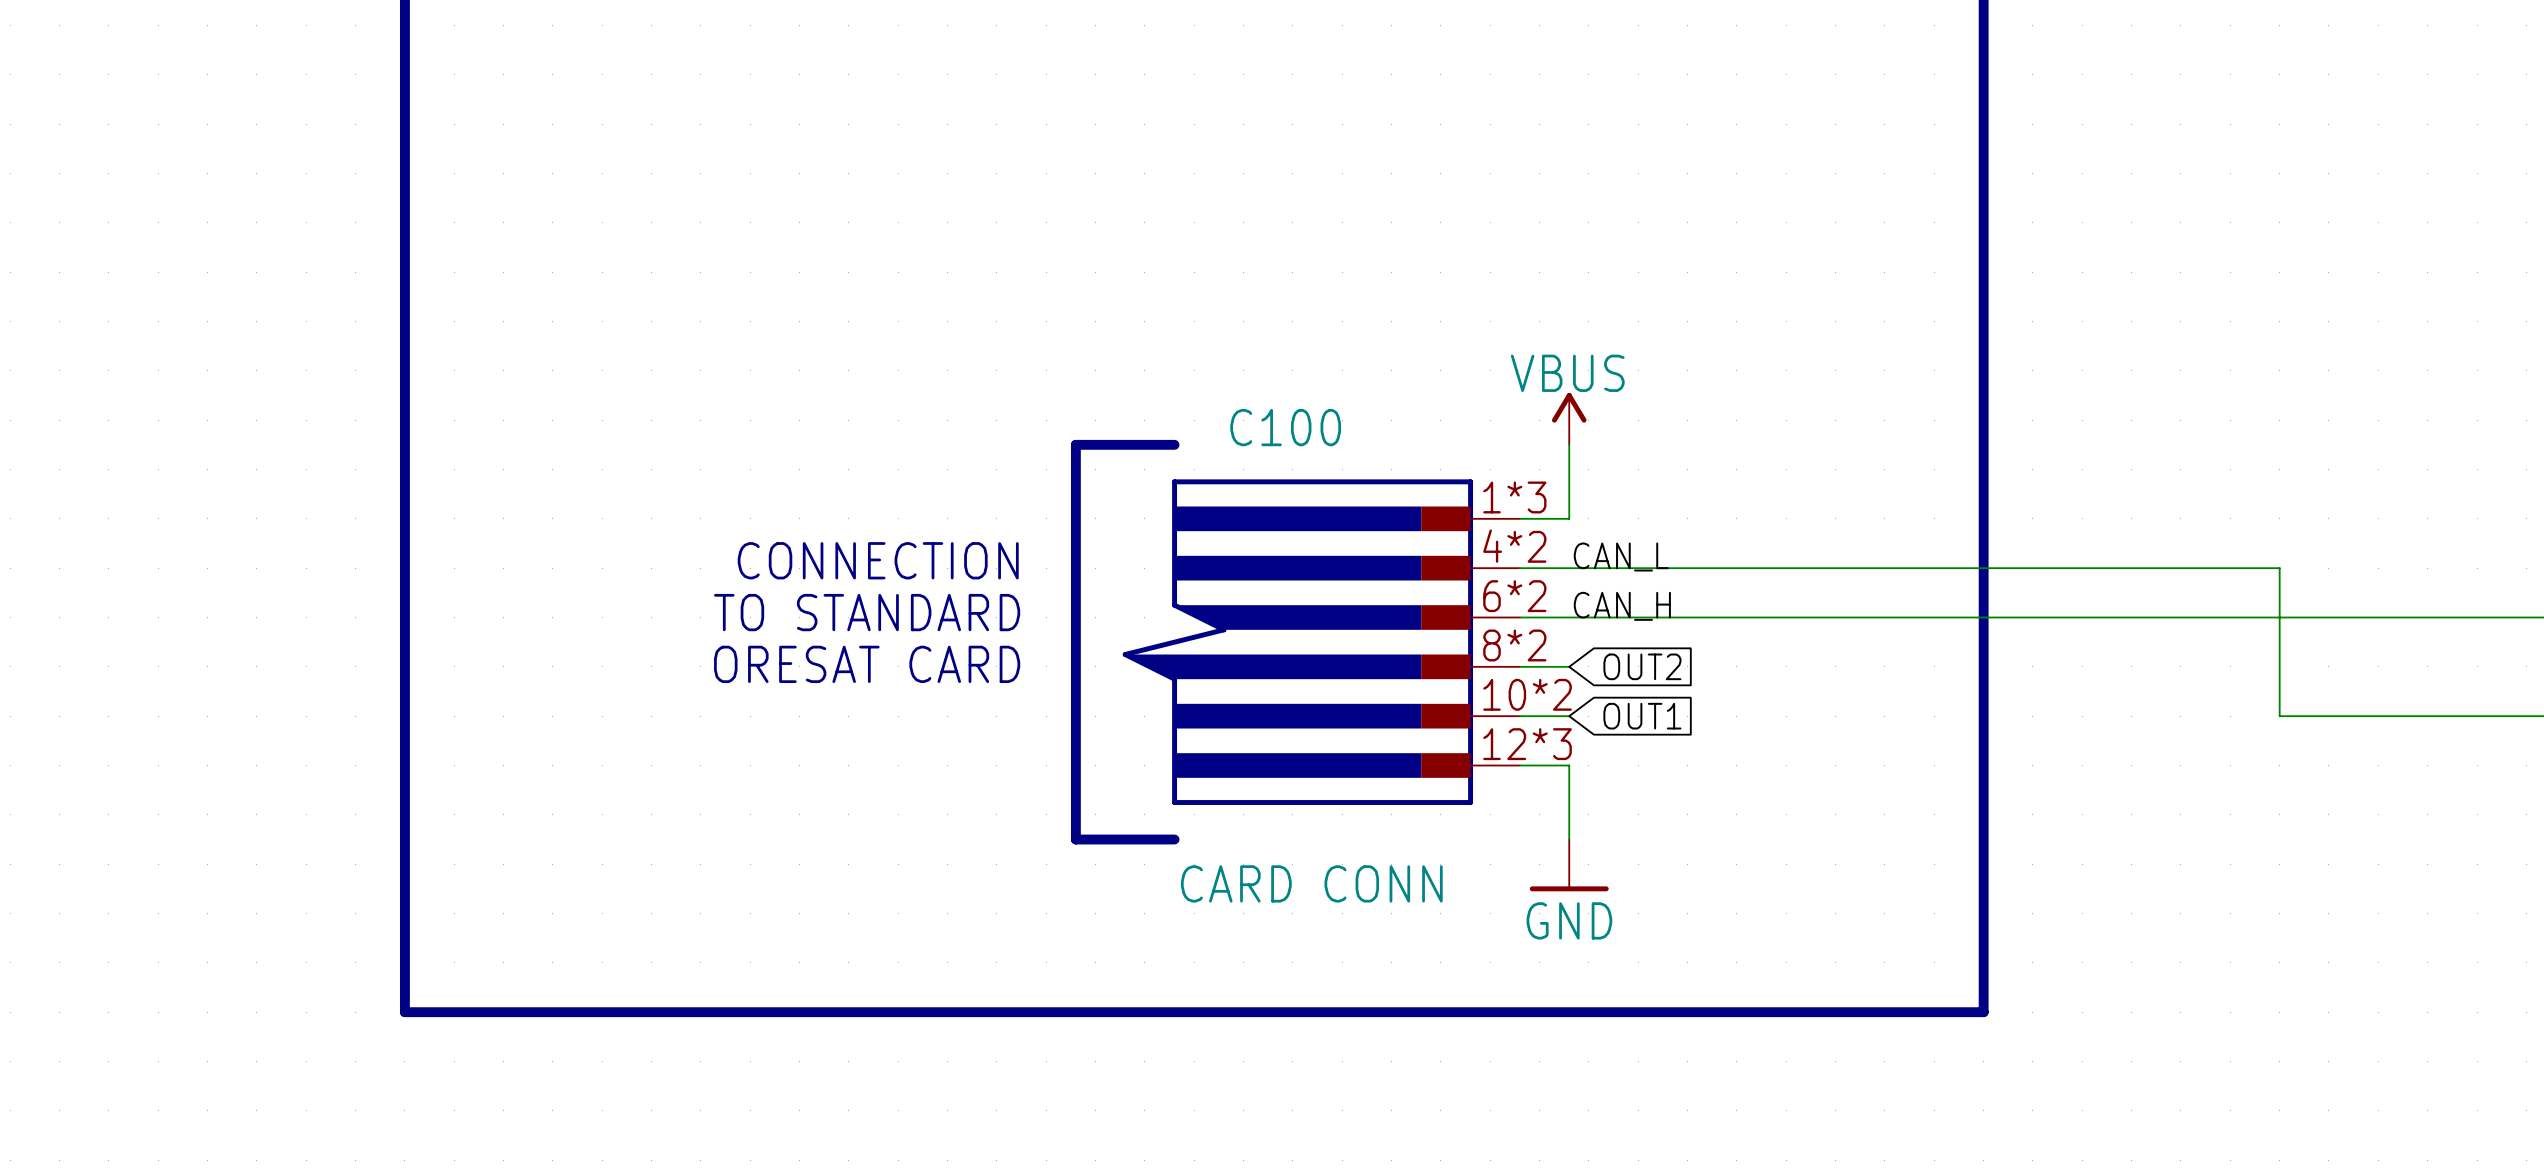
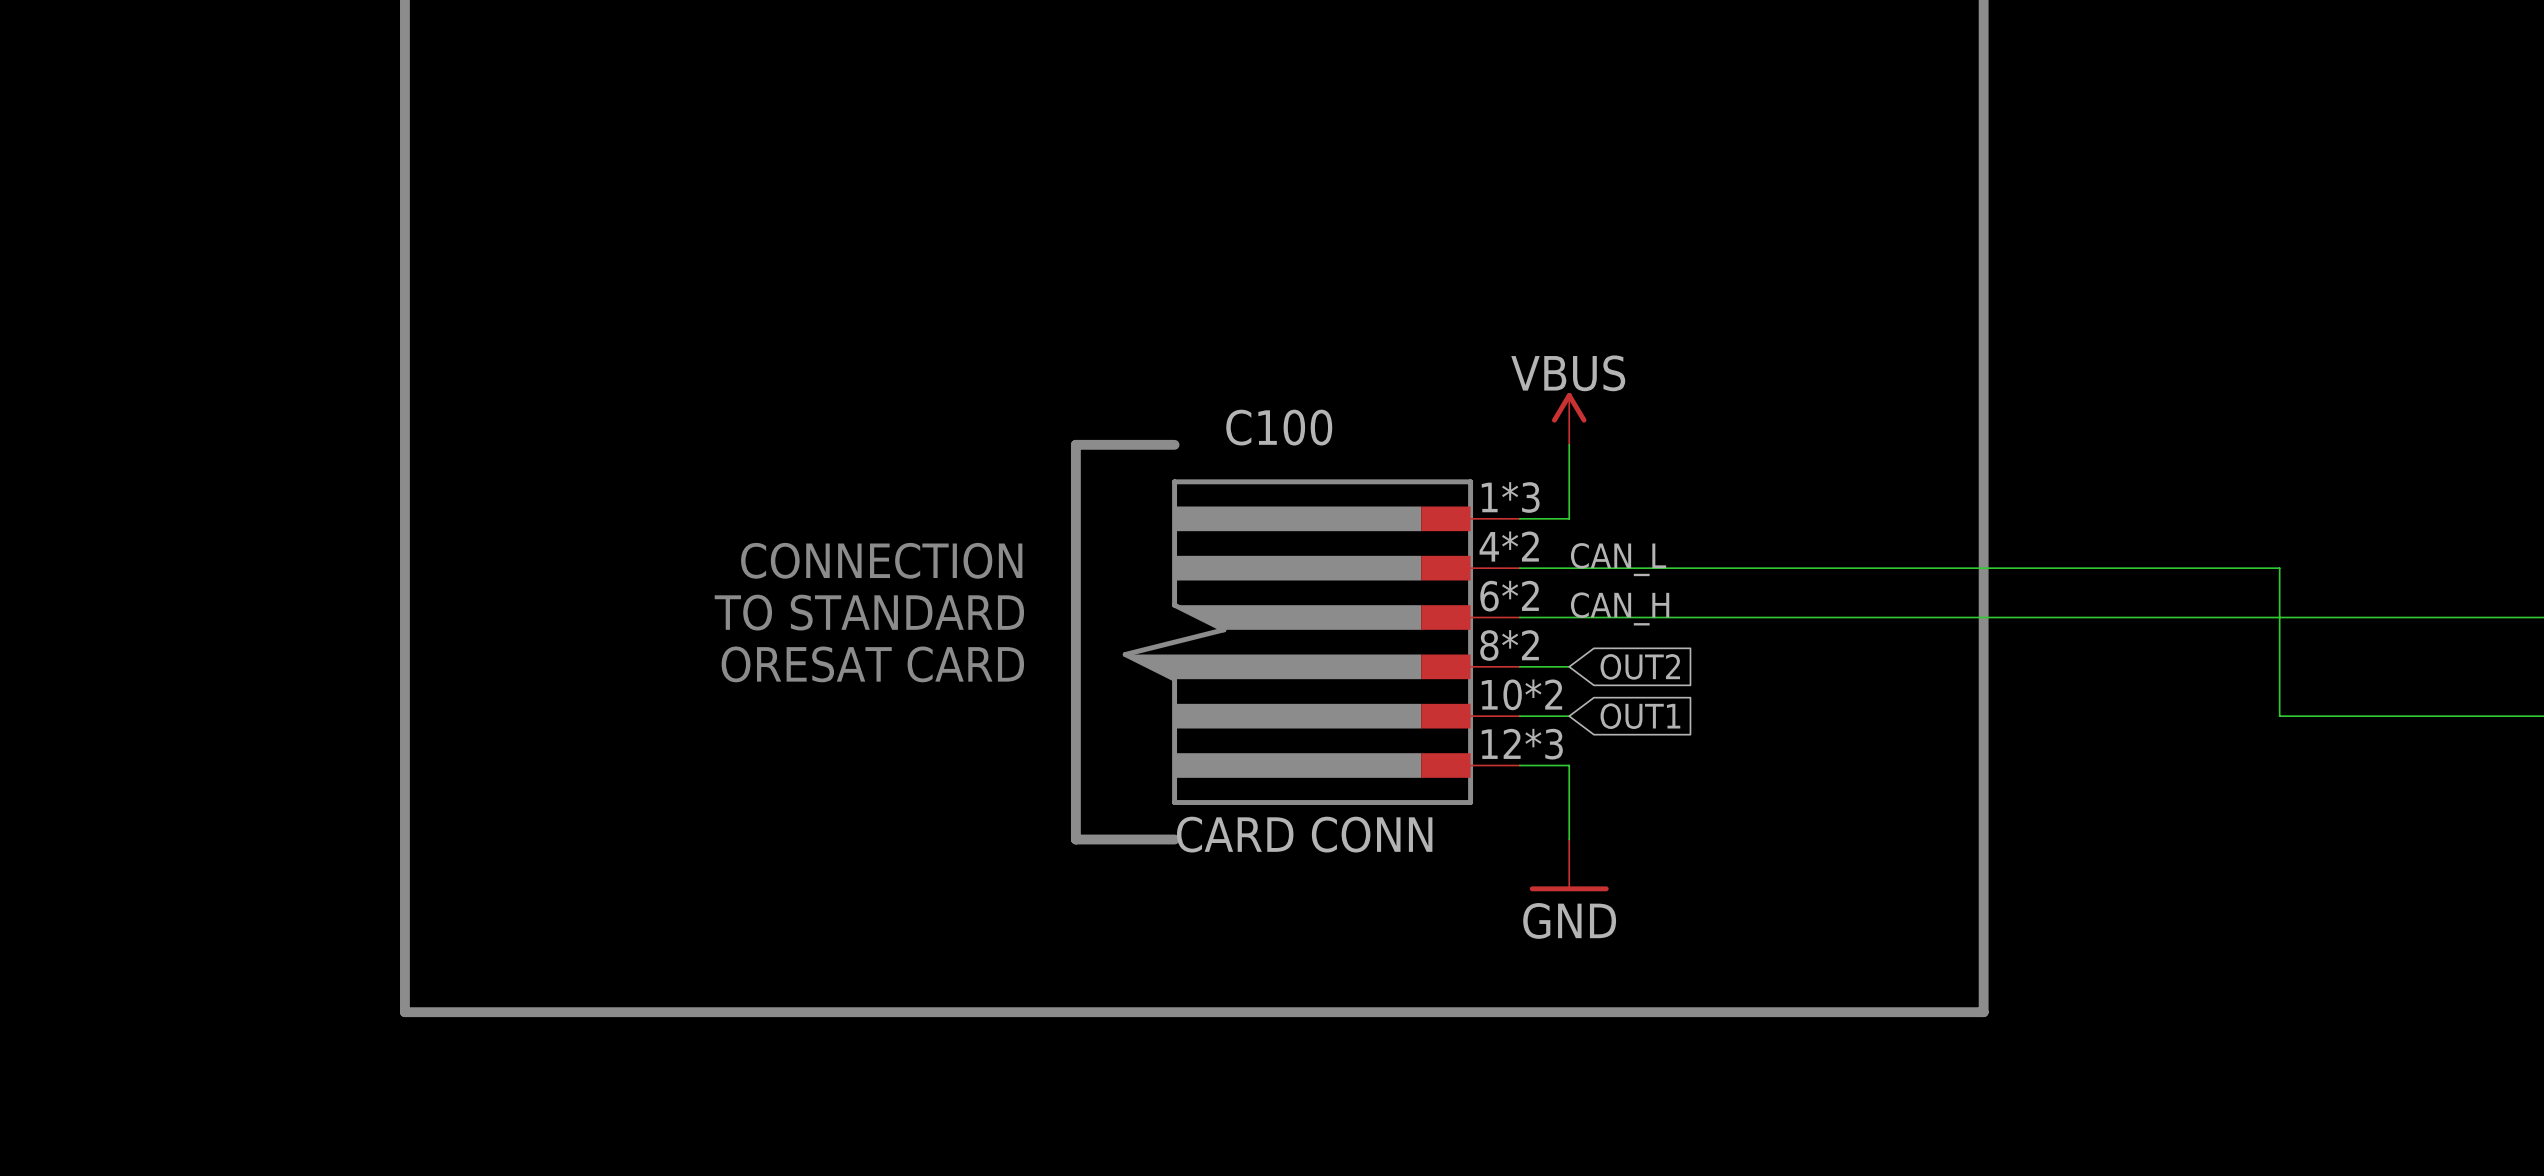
C100 value position: CARD CONN (1311, 883) -> CARD CONN (1304, 834)

